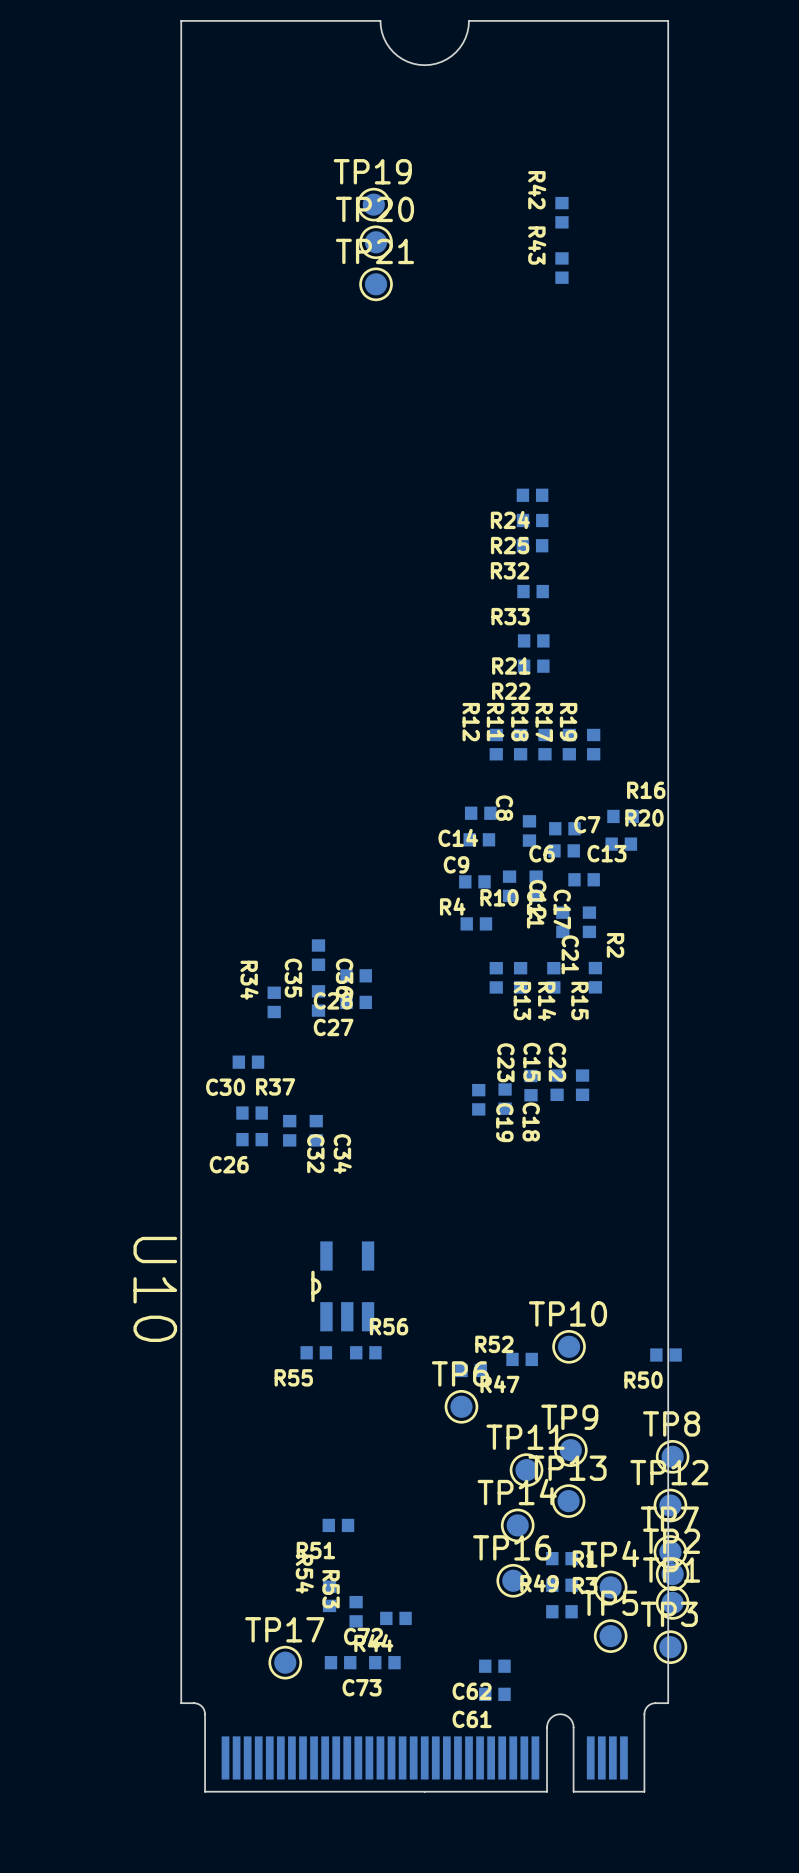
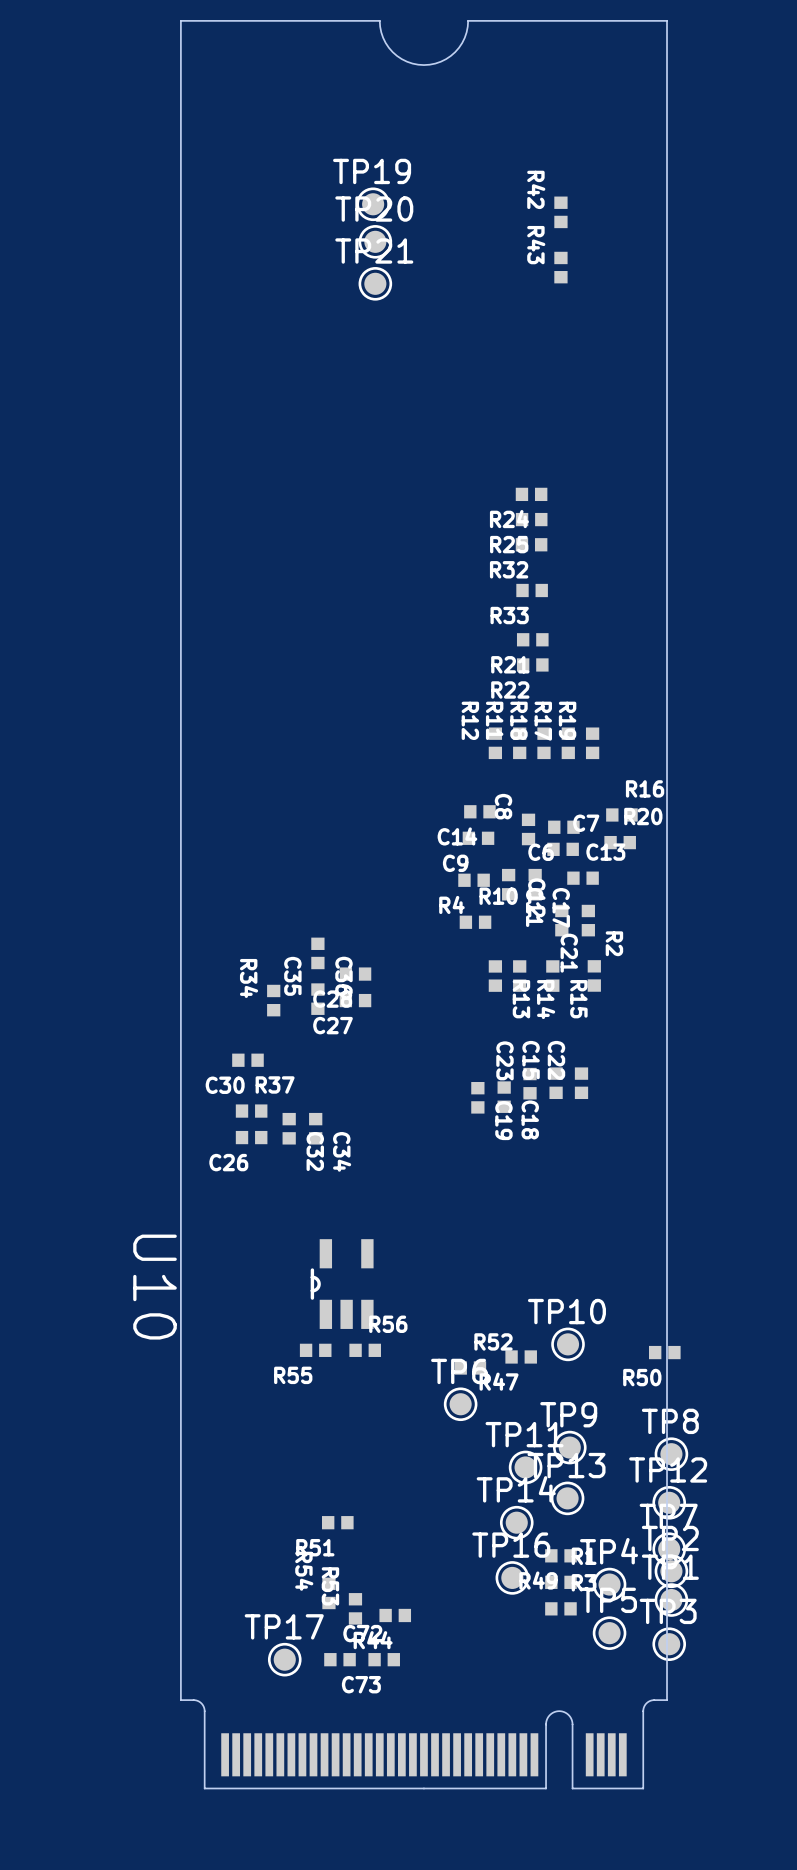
C62: (494, 1666) -> none
C61: (494, 1694) -> none

